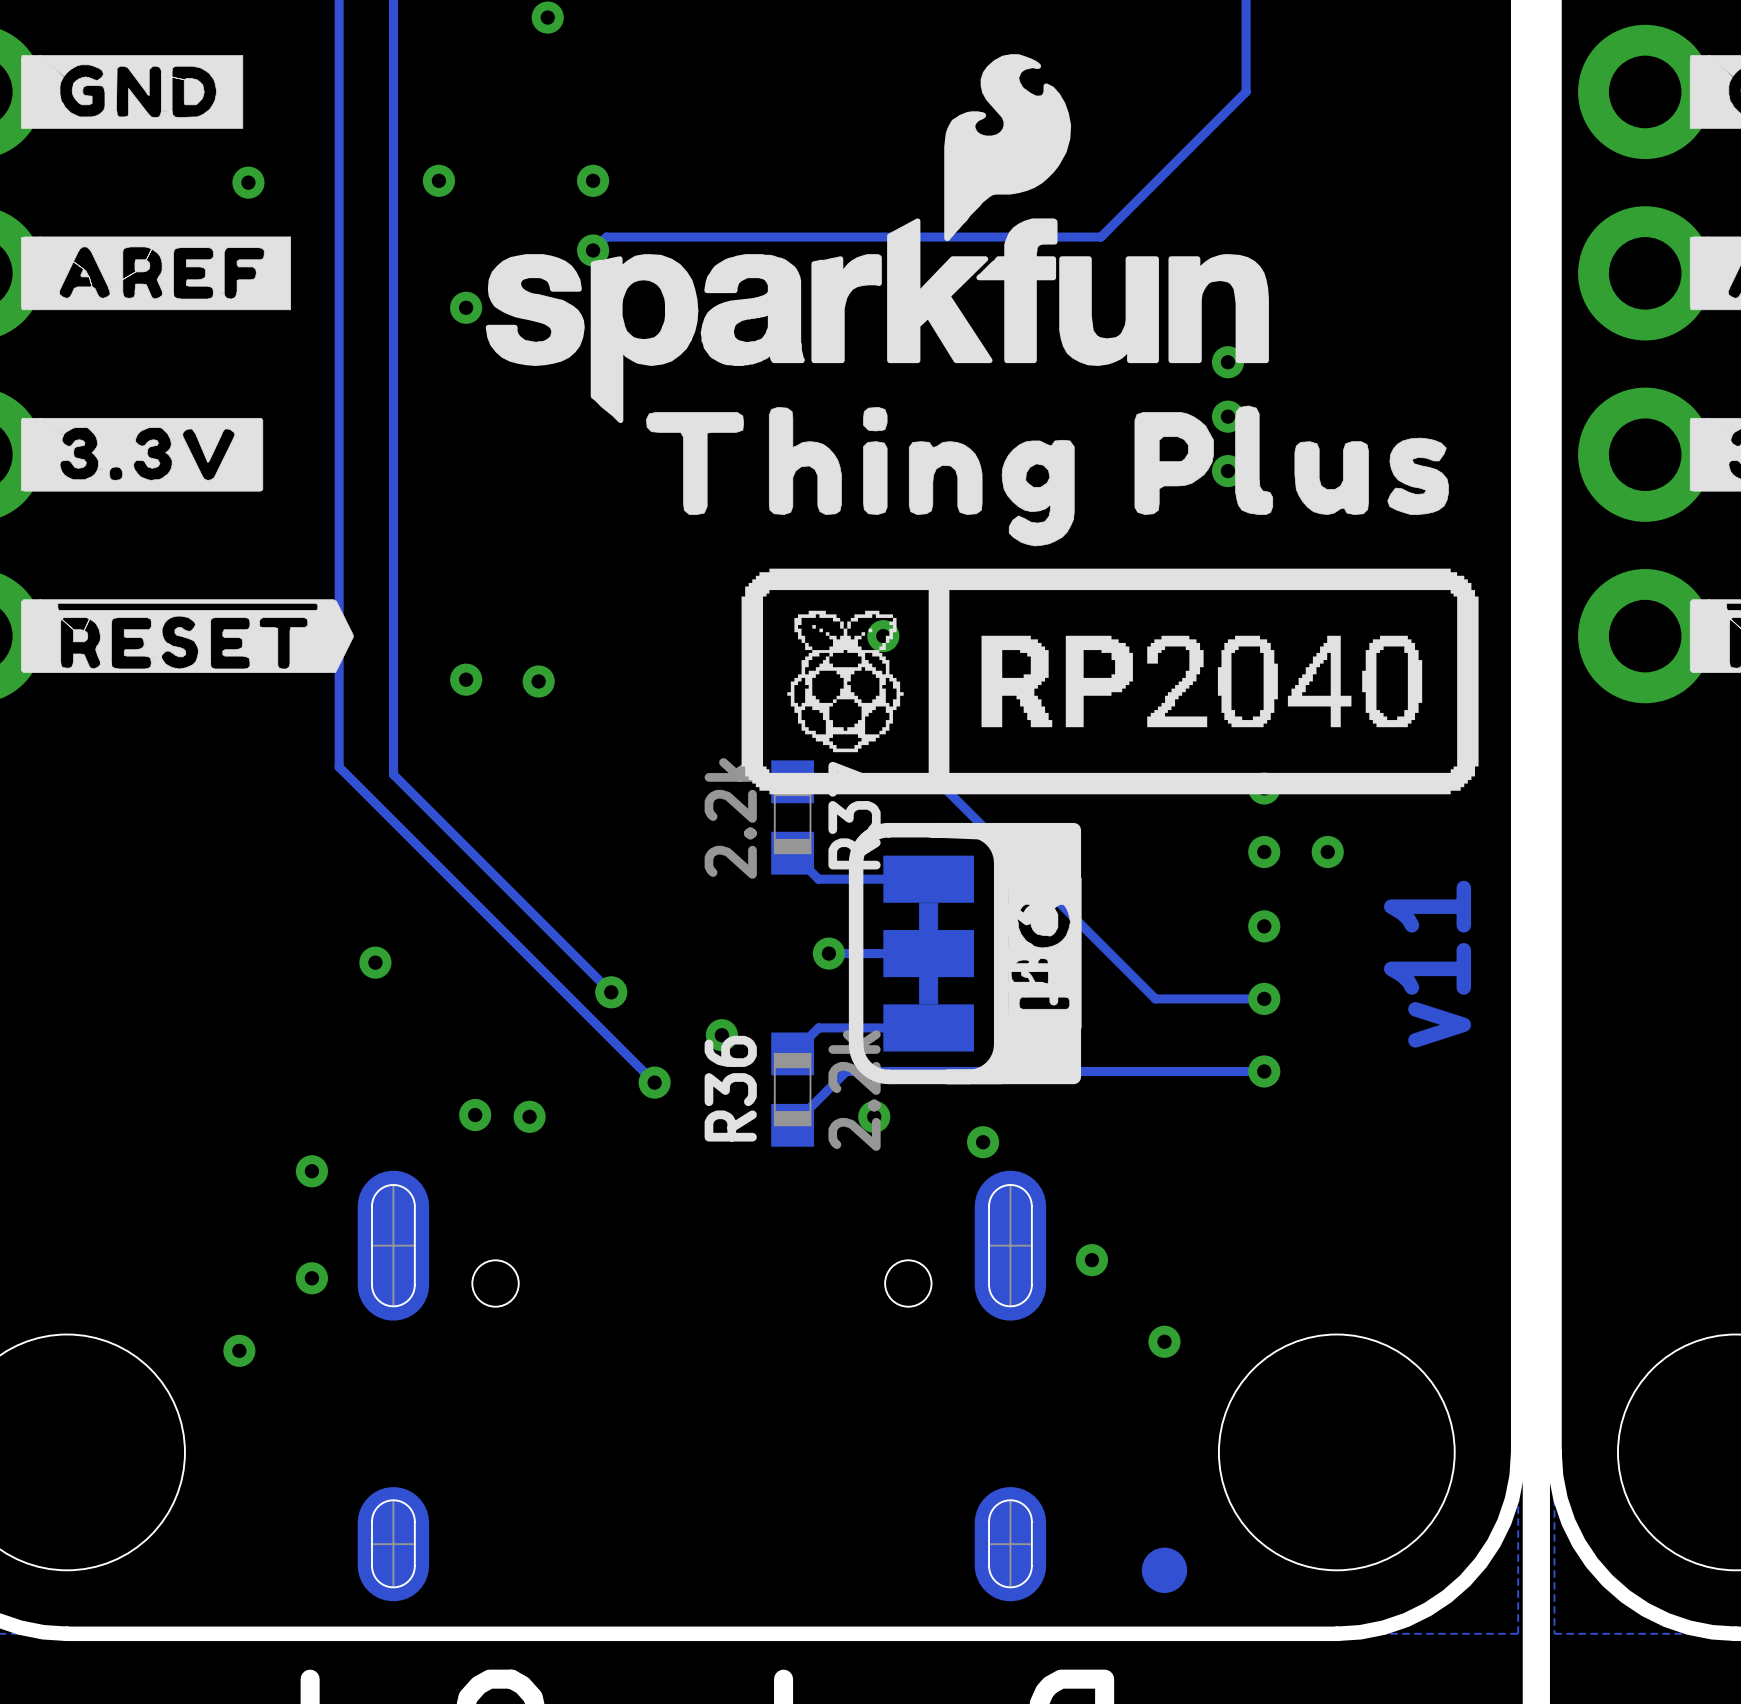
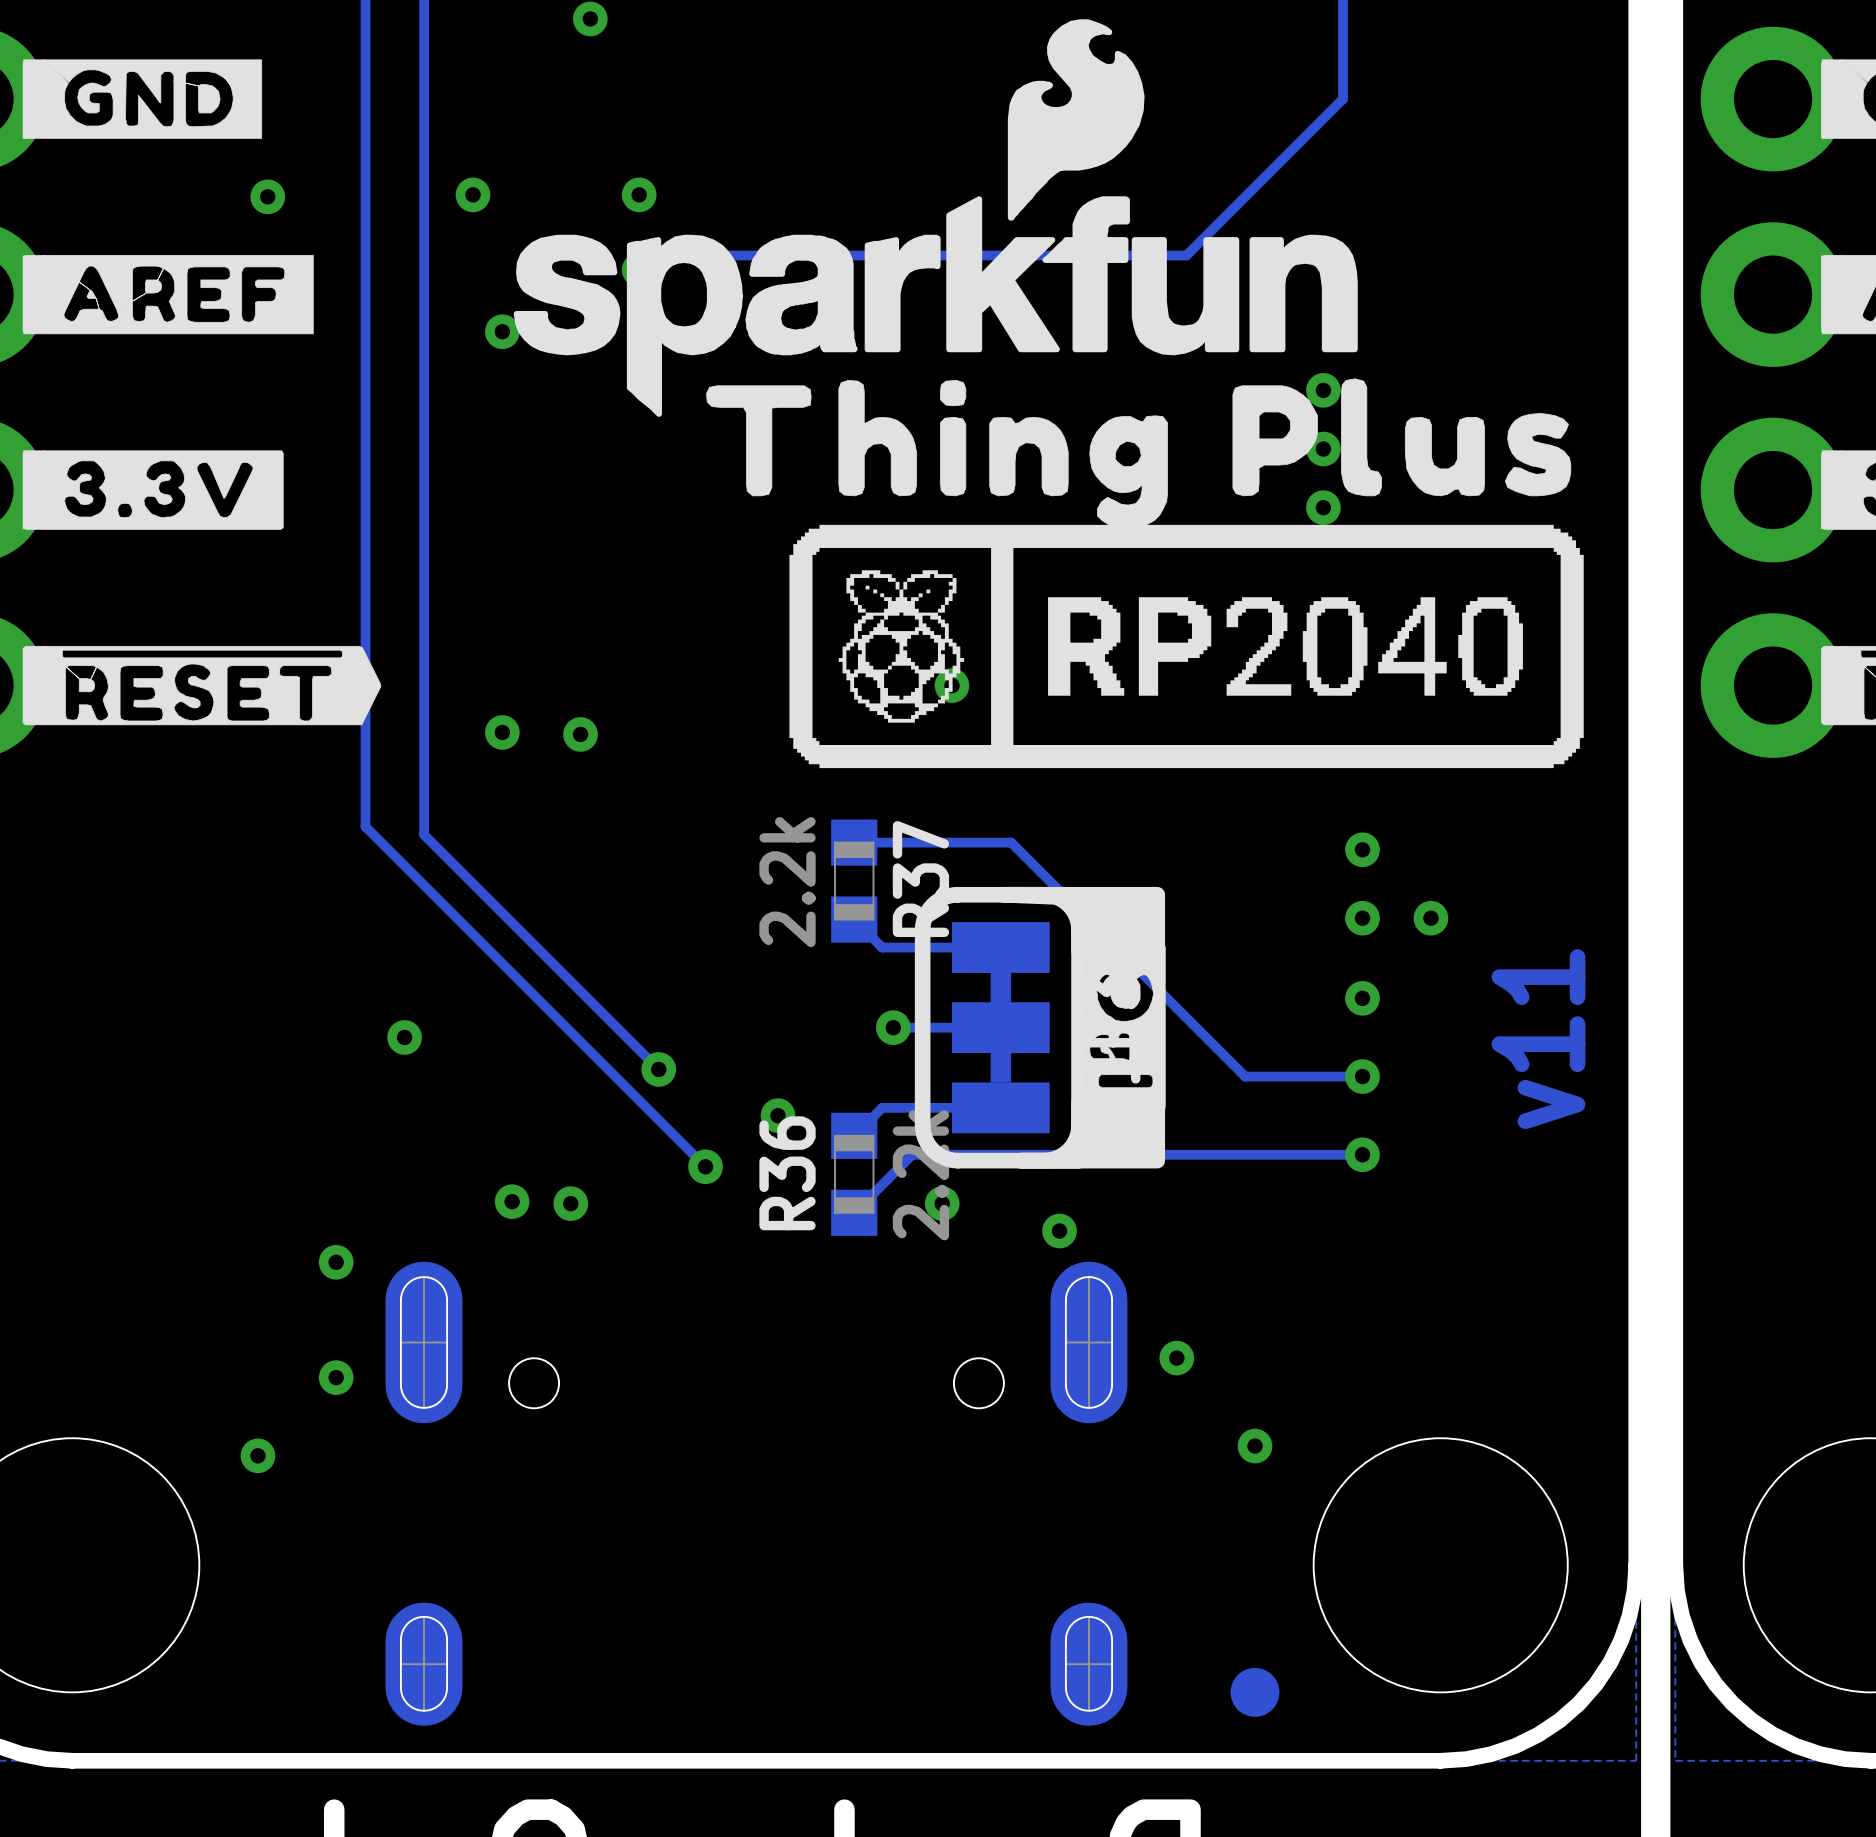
drawing position: (877, 238) -> (935, 218)
drawing position: (1047, 475) -> (1138, 454)
drawing position: (1110, 681) -> (1186, 646)

